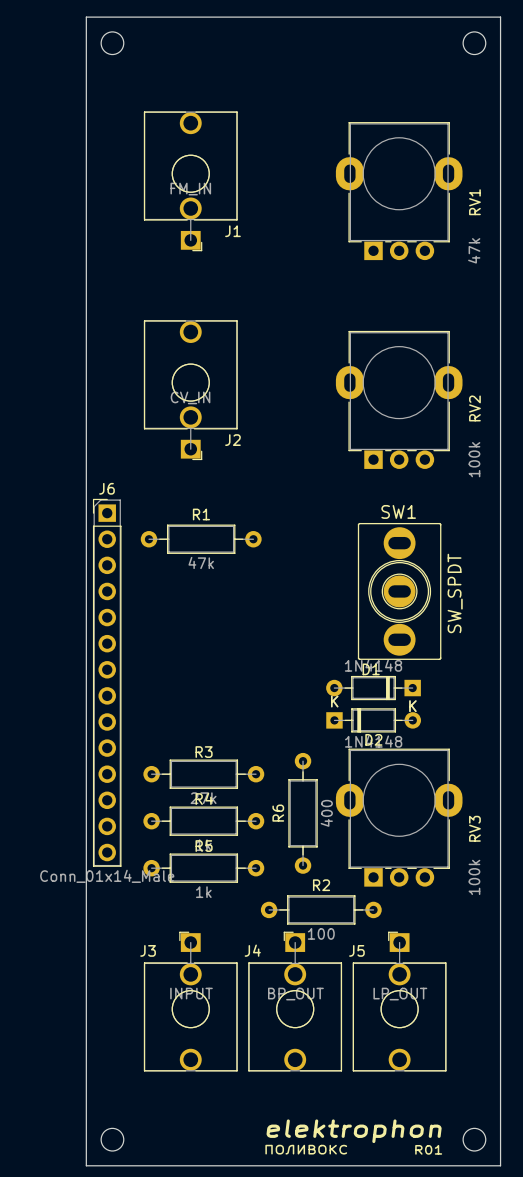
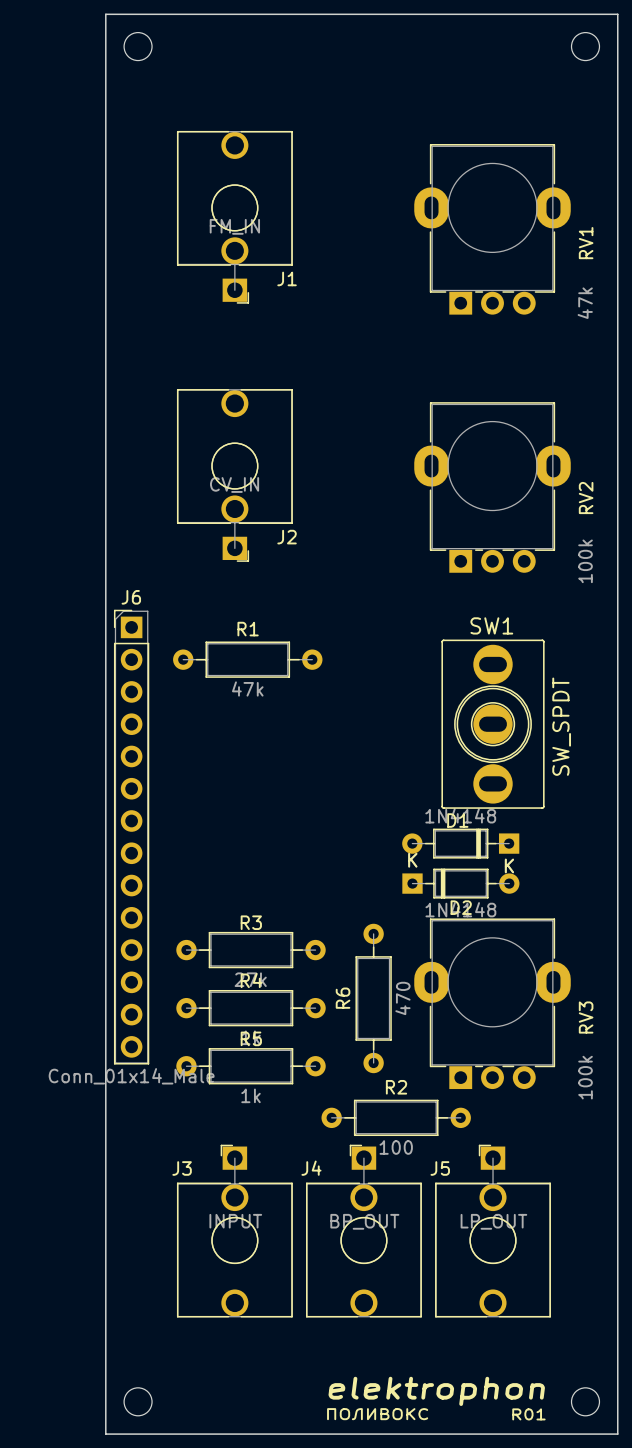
R6 value: 400 (326, 813) -> 470 (402, 998)

